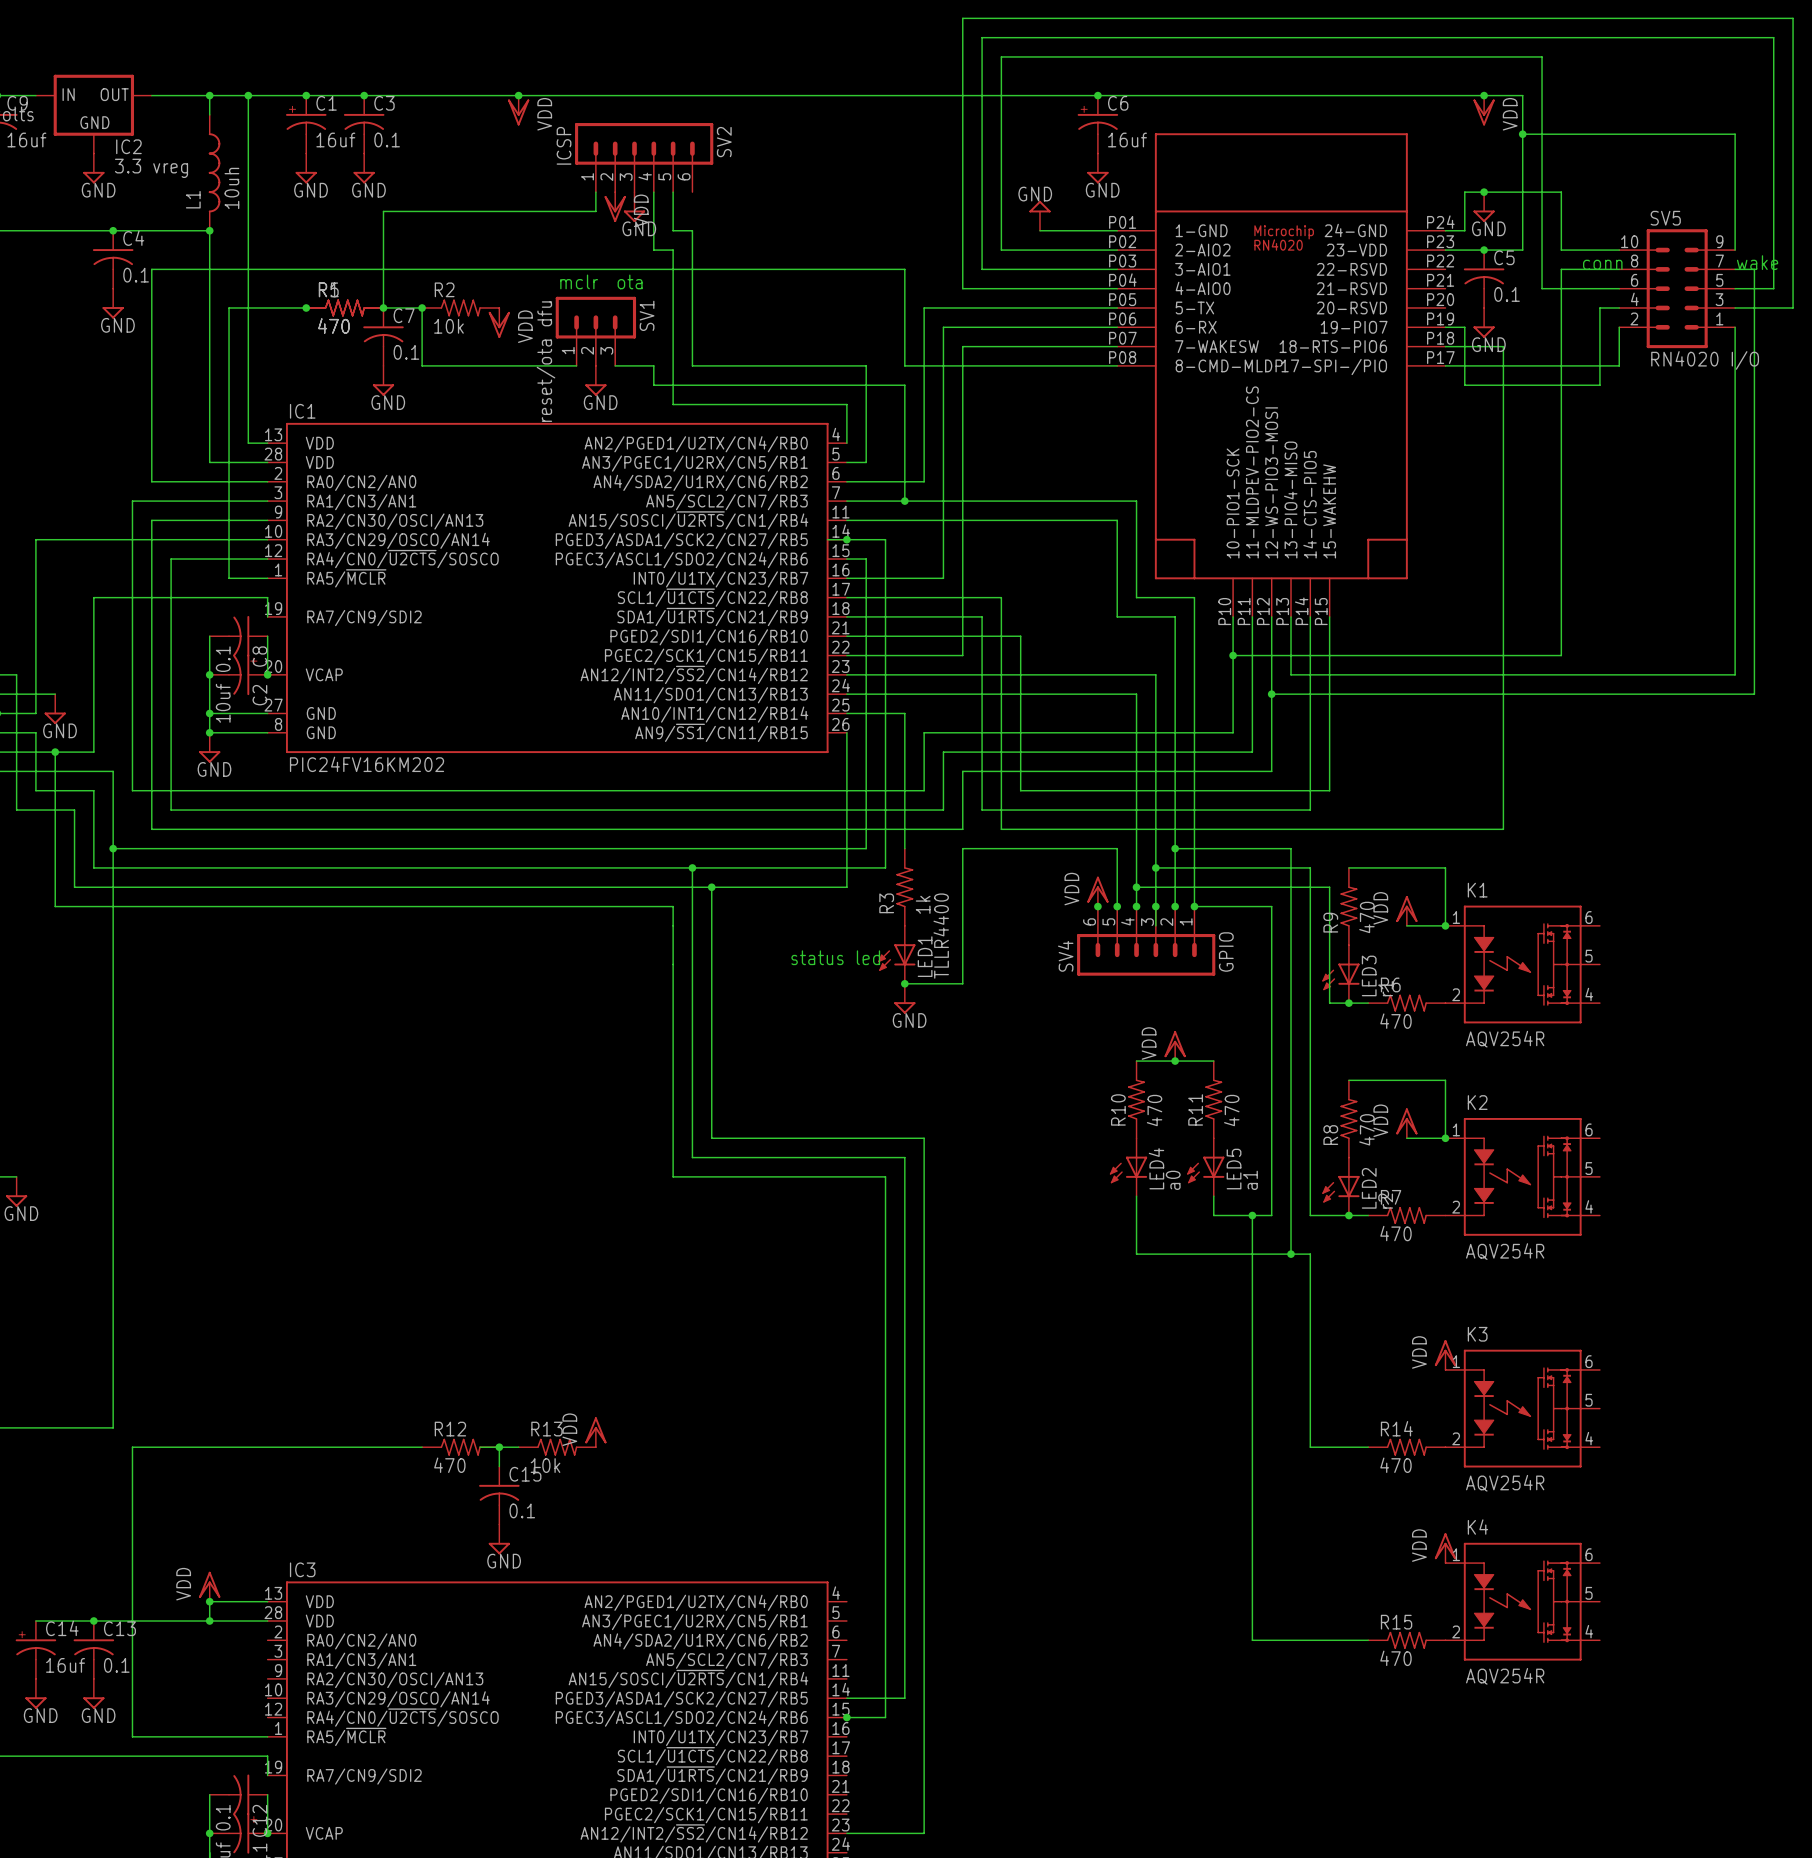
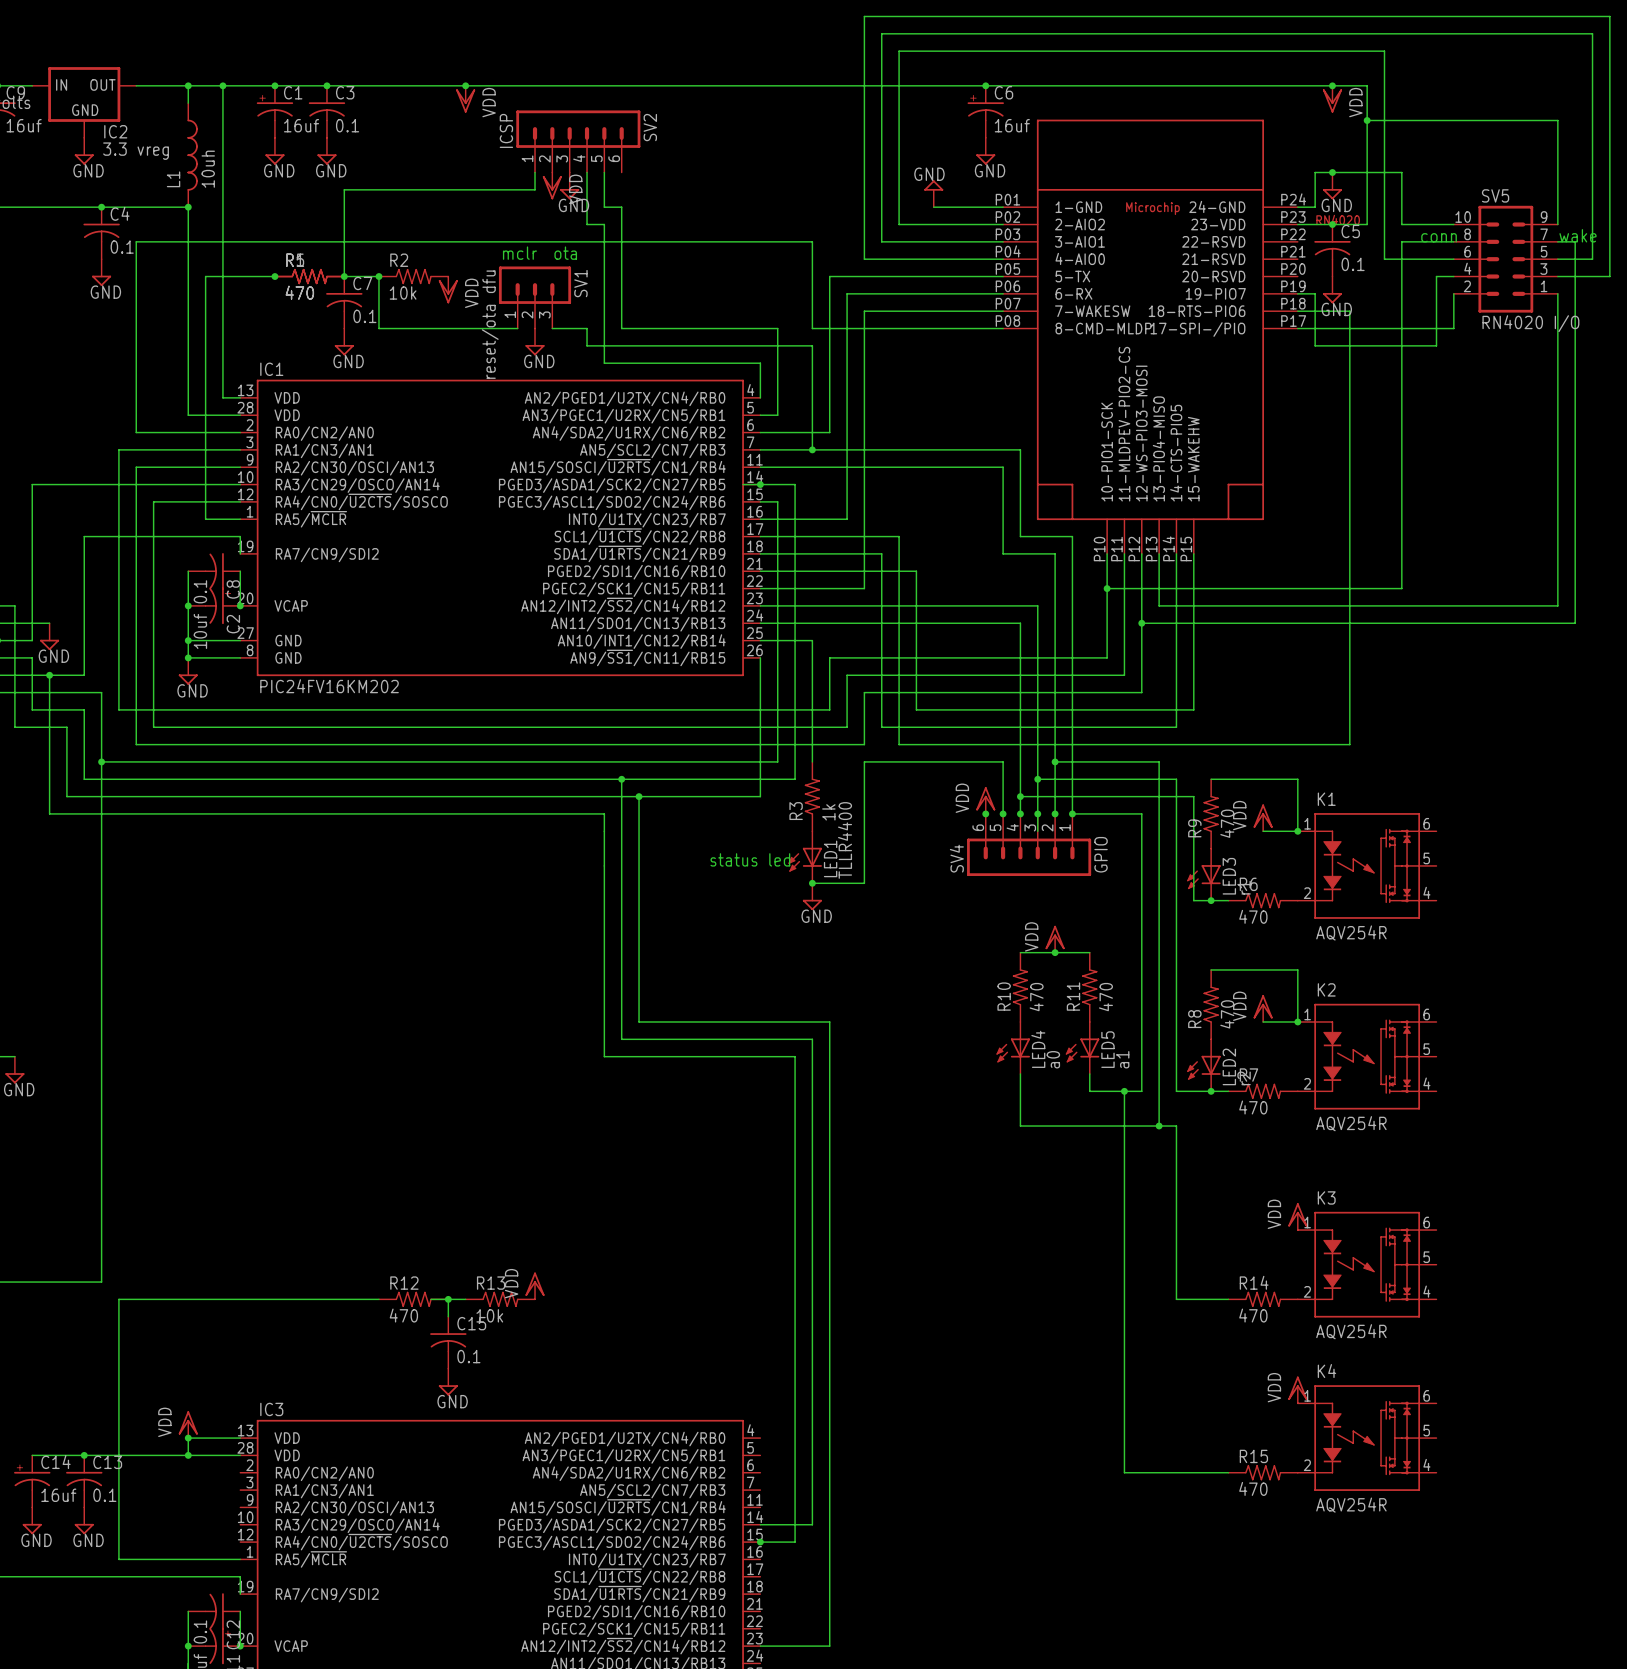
part symbol: [1117, 133, 1446, 617] -> [1003, 119, 1298, 554]

